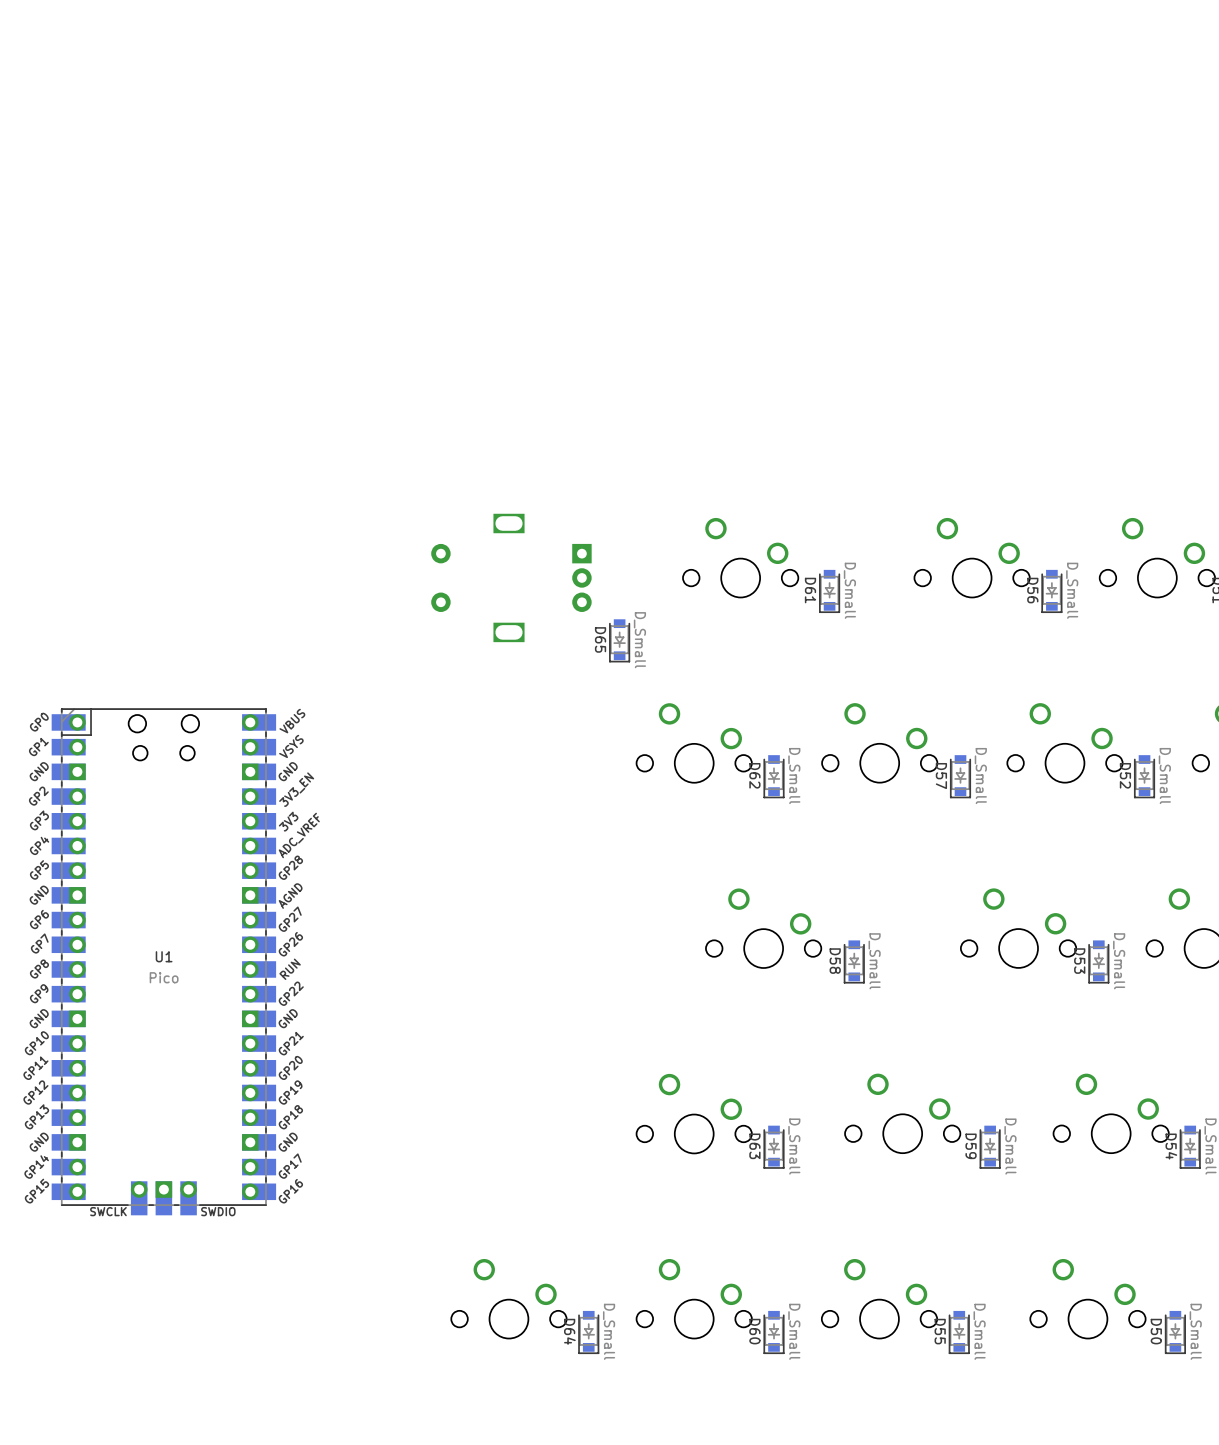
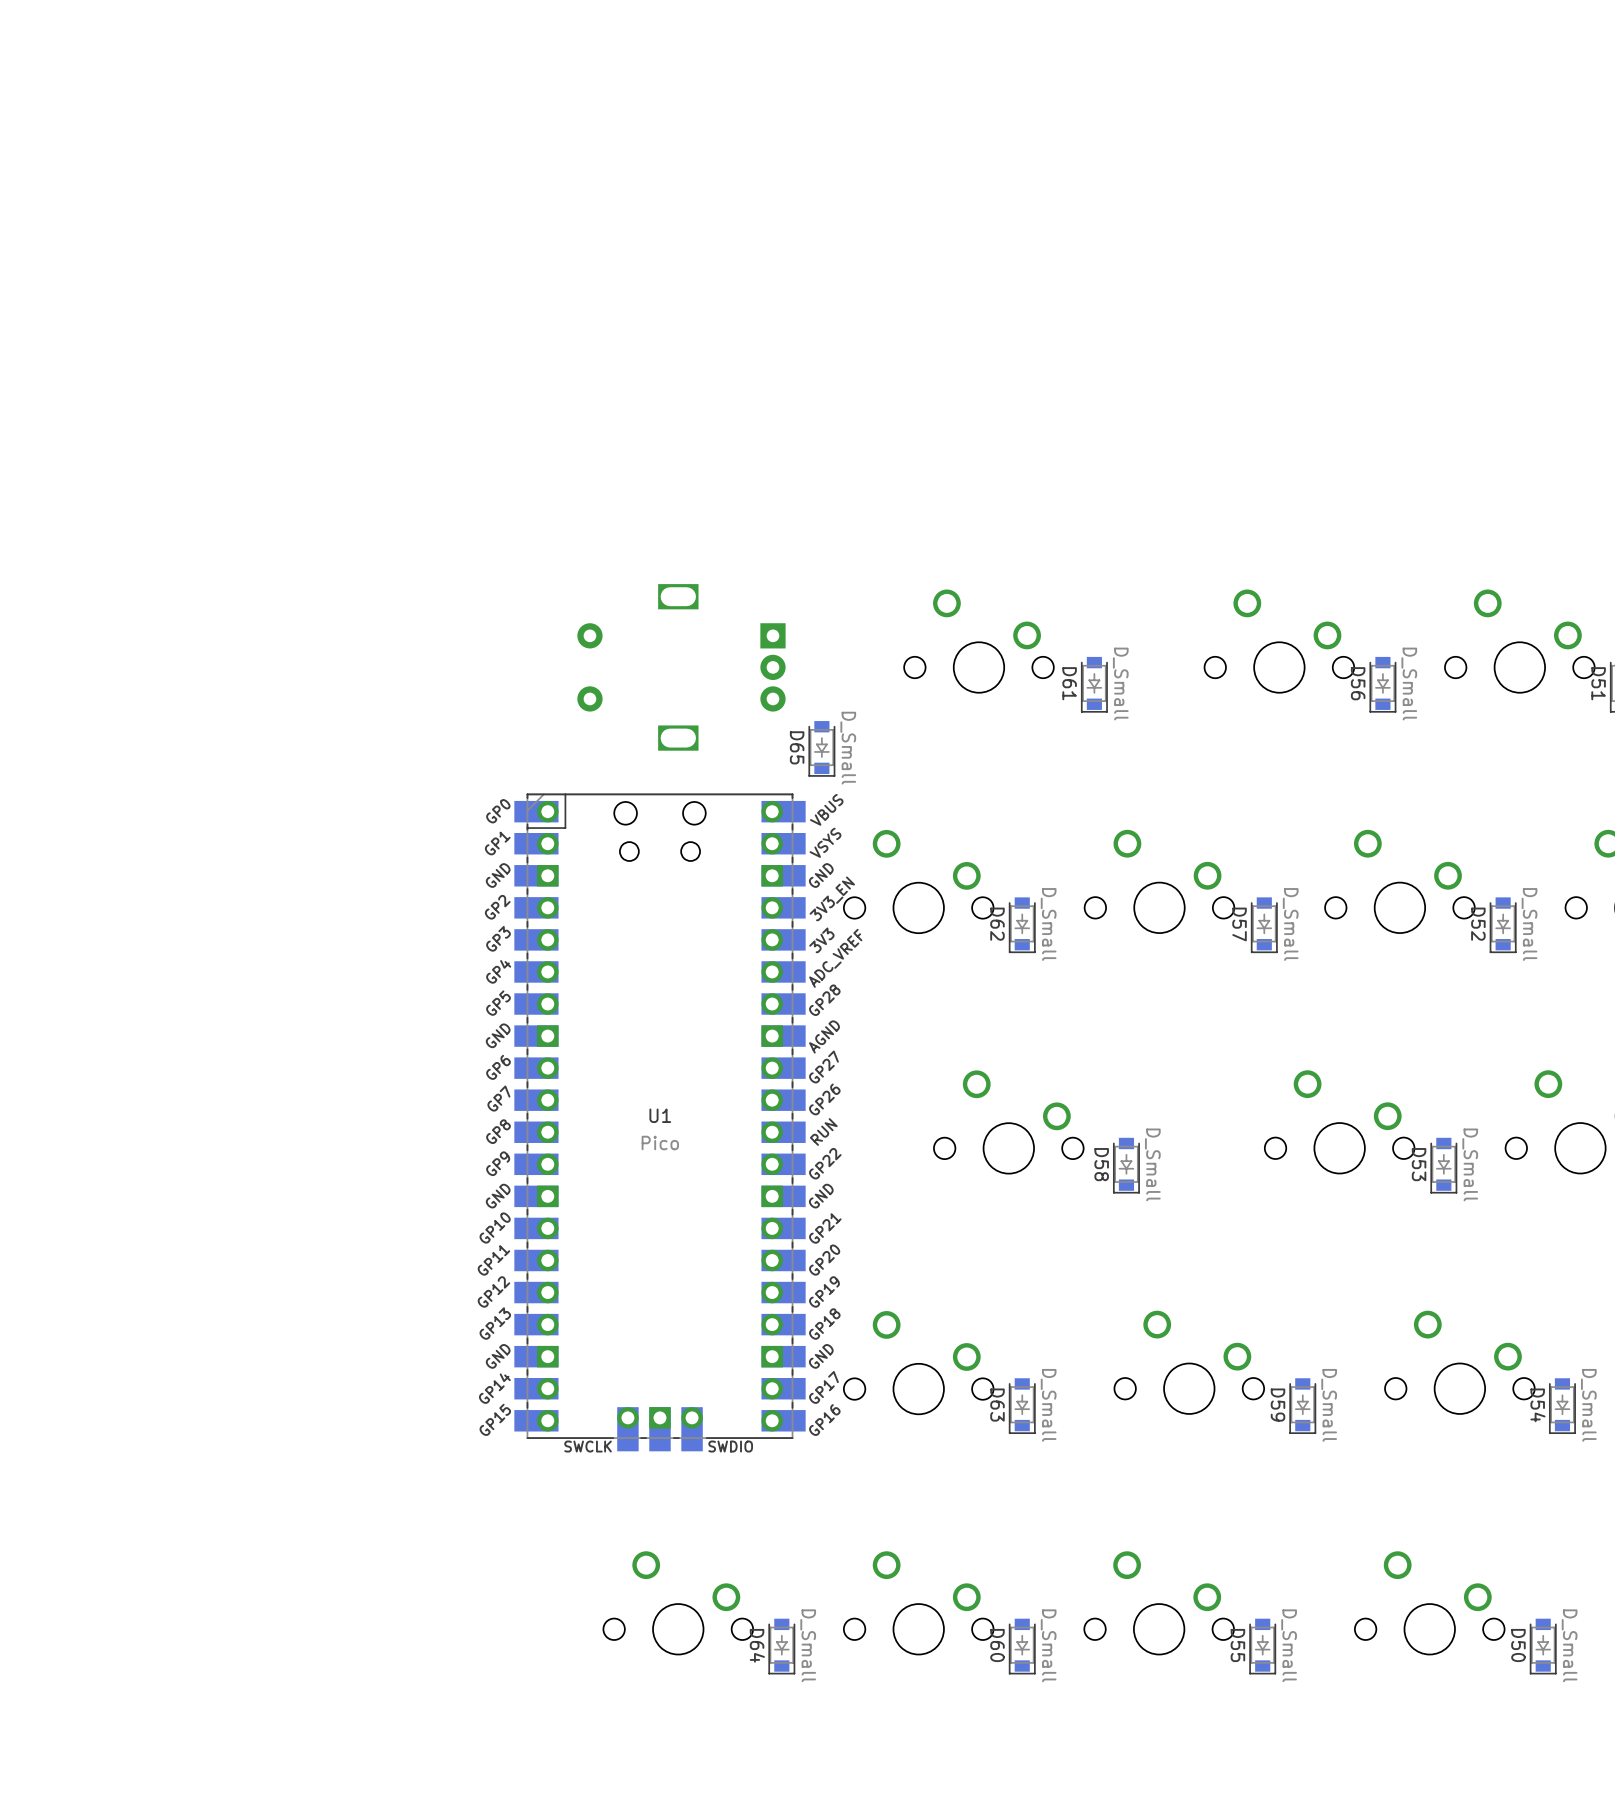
U1 position: (163, 961) -> (659, 1122)

